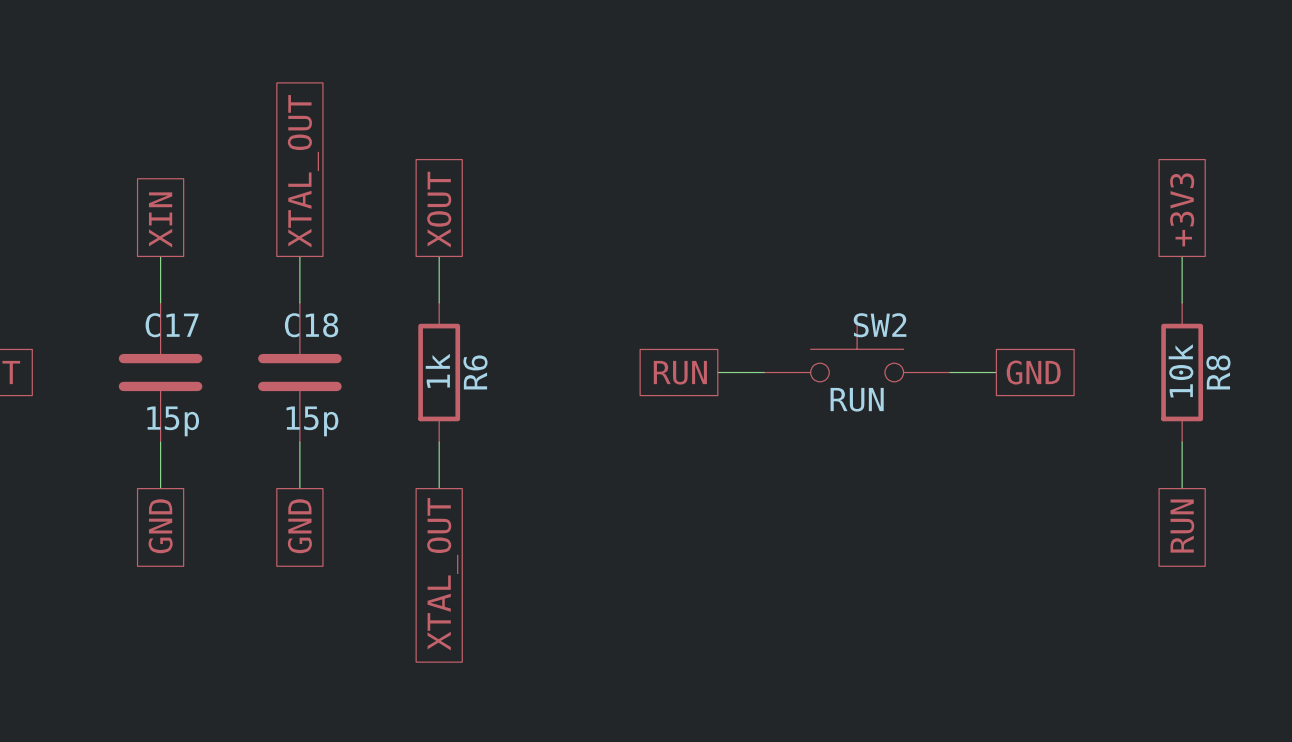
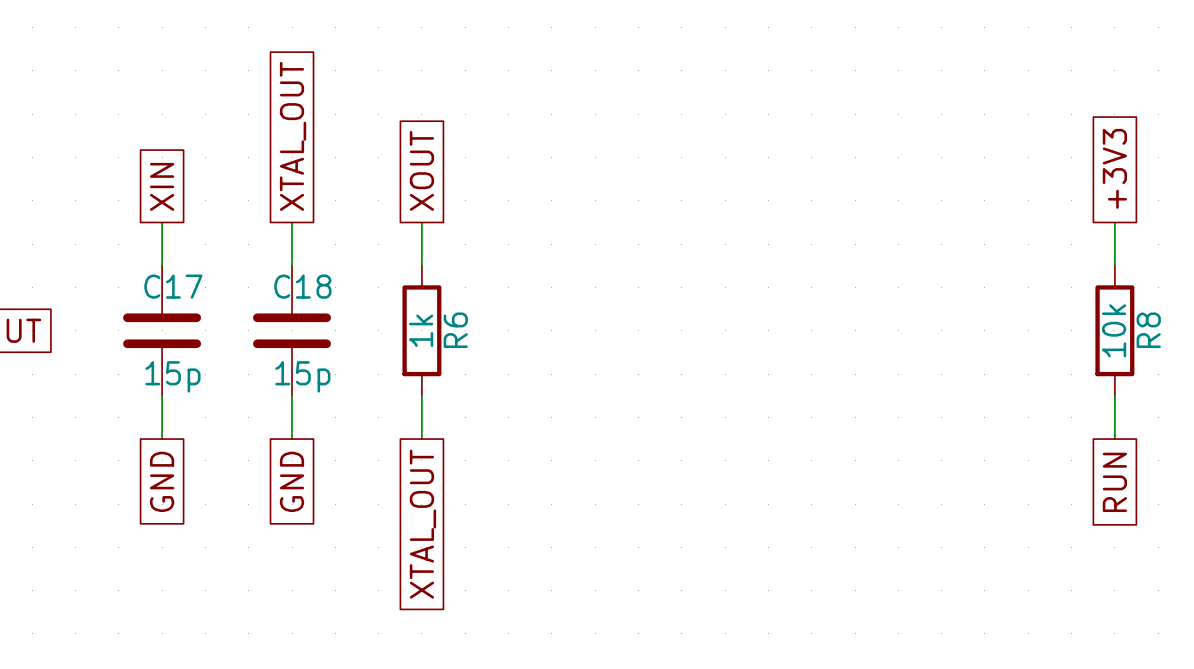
SW2: RUN (857, 349) -> none
global label: RUN (680, 372) -> none
wire: (717, 372) (764, 372) -> none
wire: (949, 372) (996, 372) -> none
global label: GND (1033, 372) -> none

